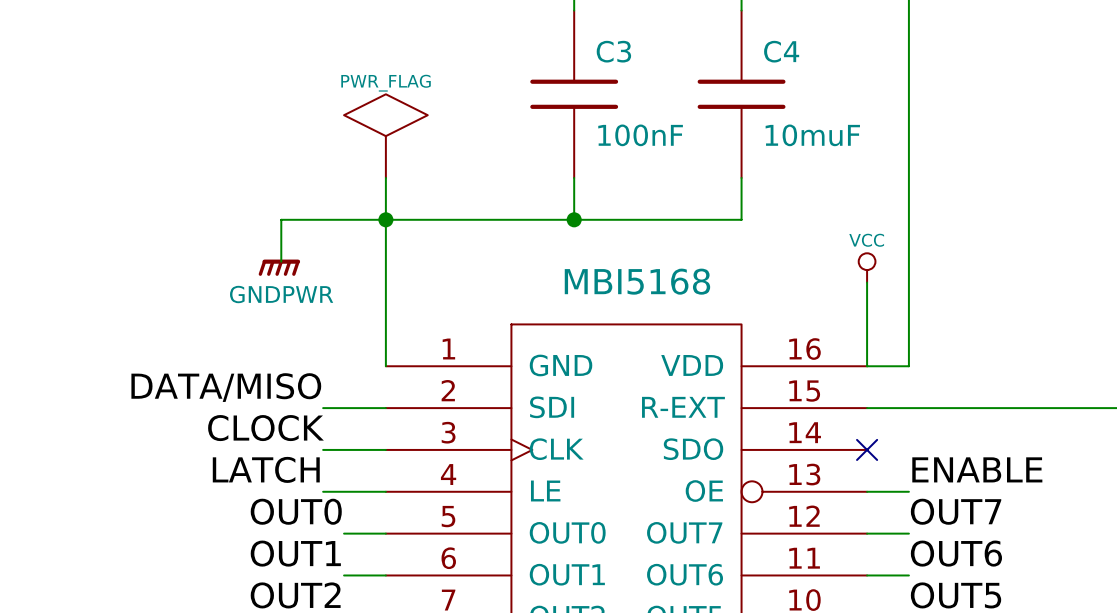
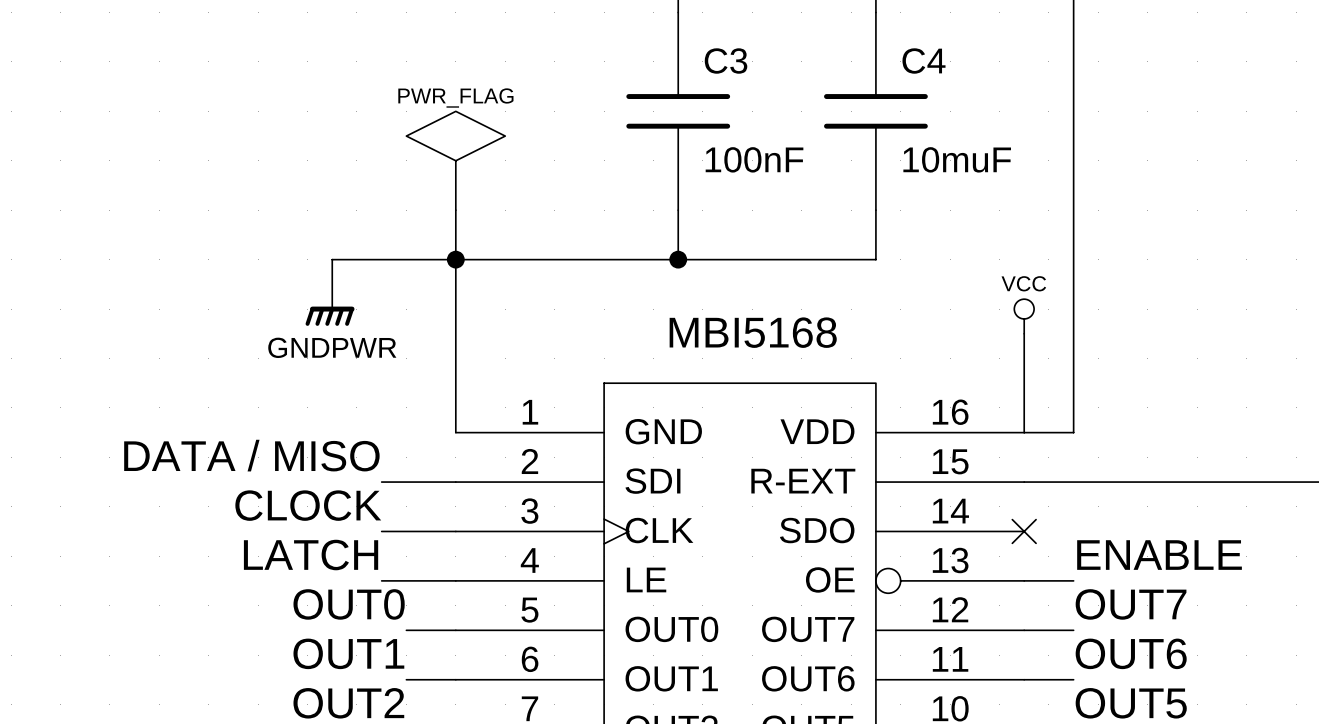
label: DATA/MISO (226, 387) -> DATA / MISO (251, 455)

